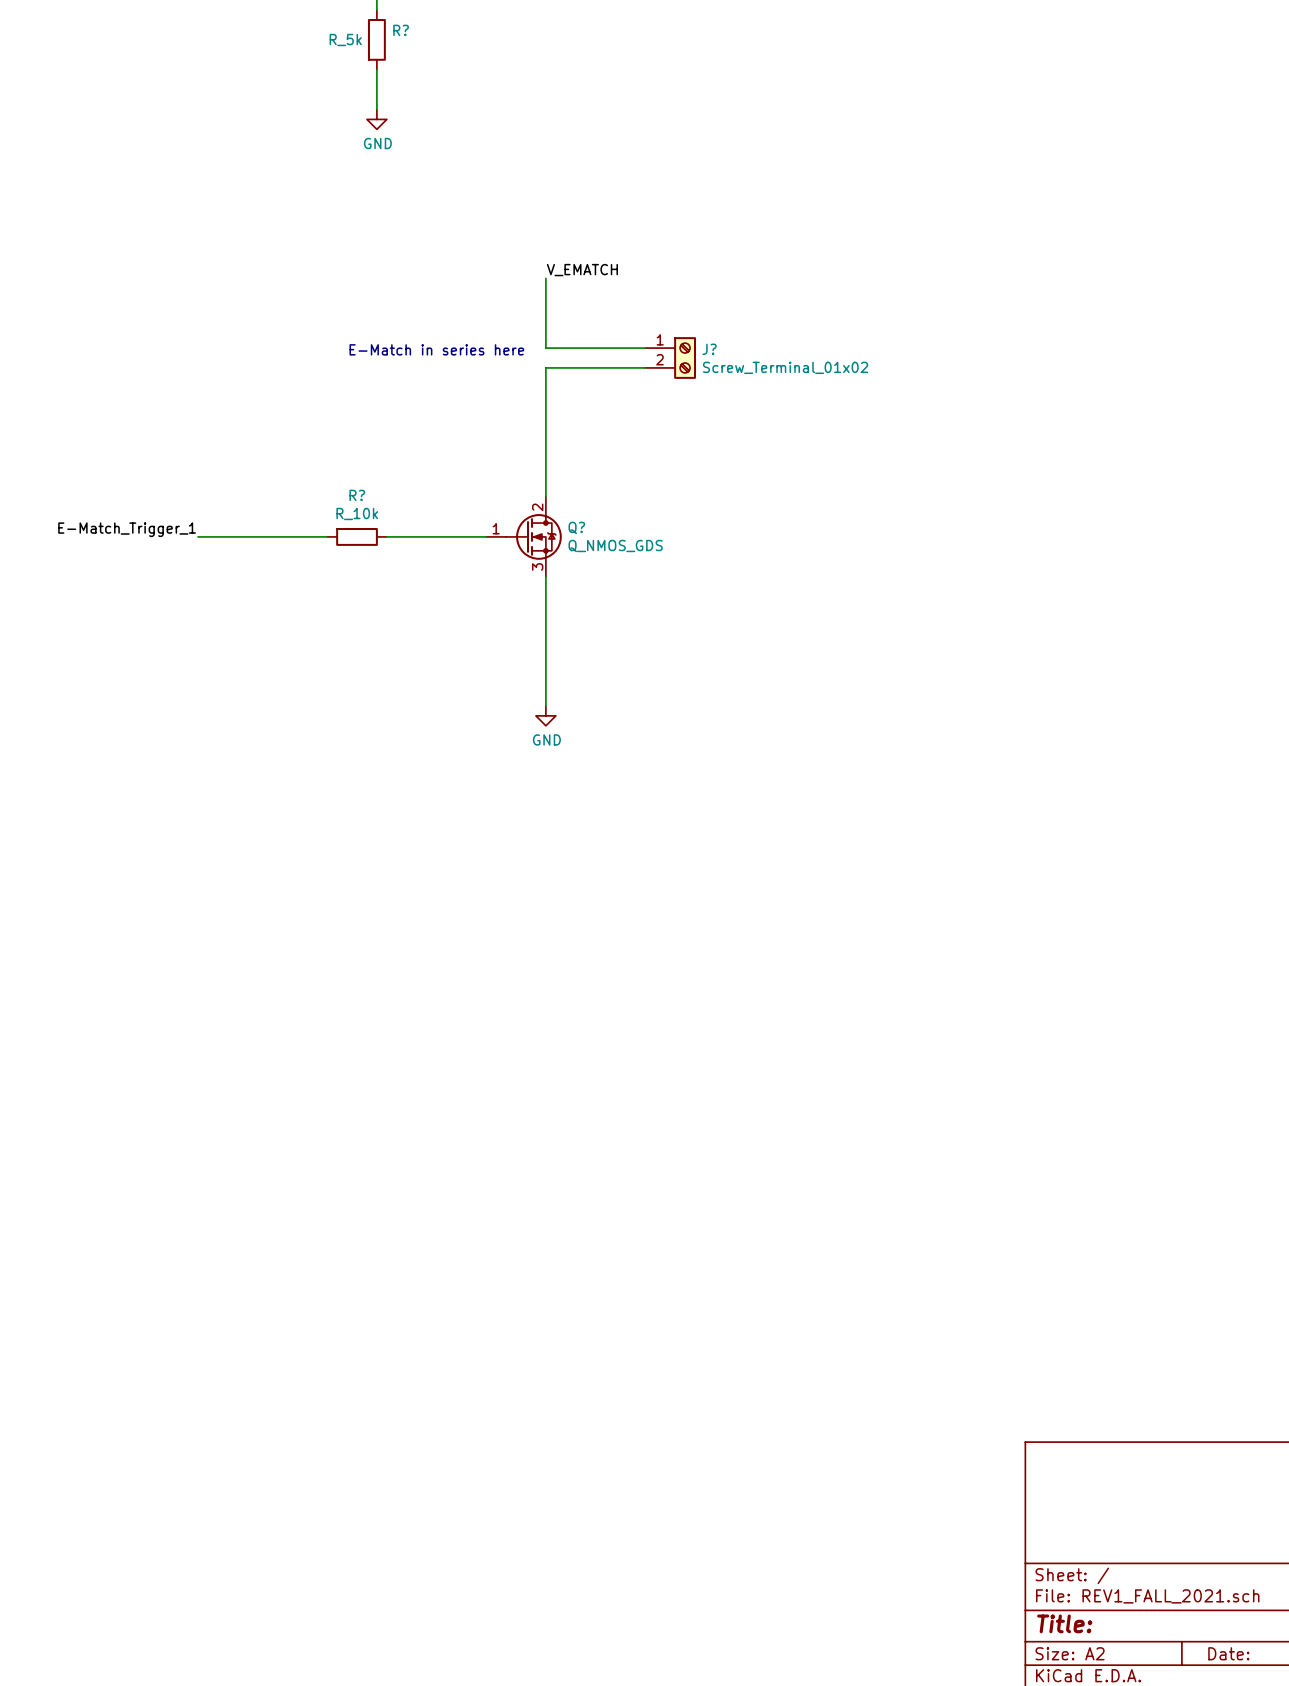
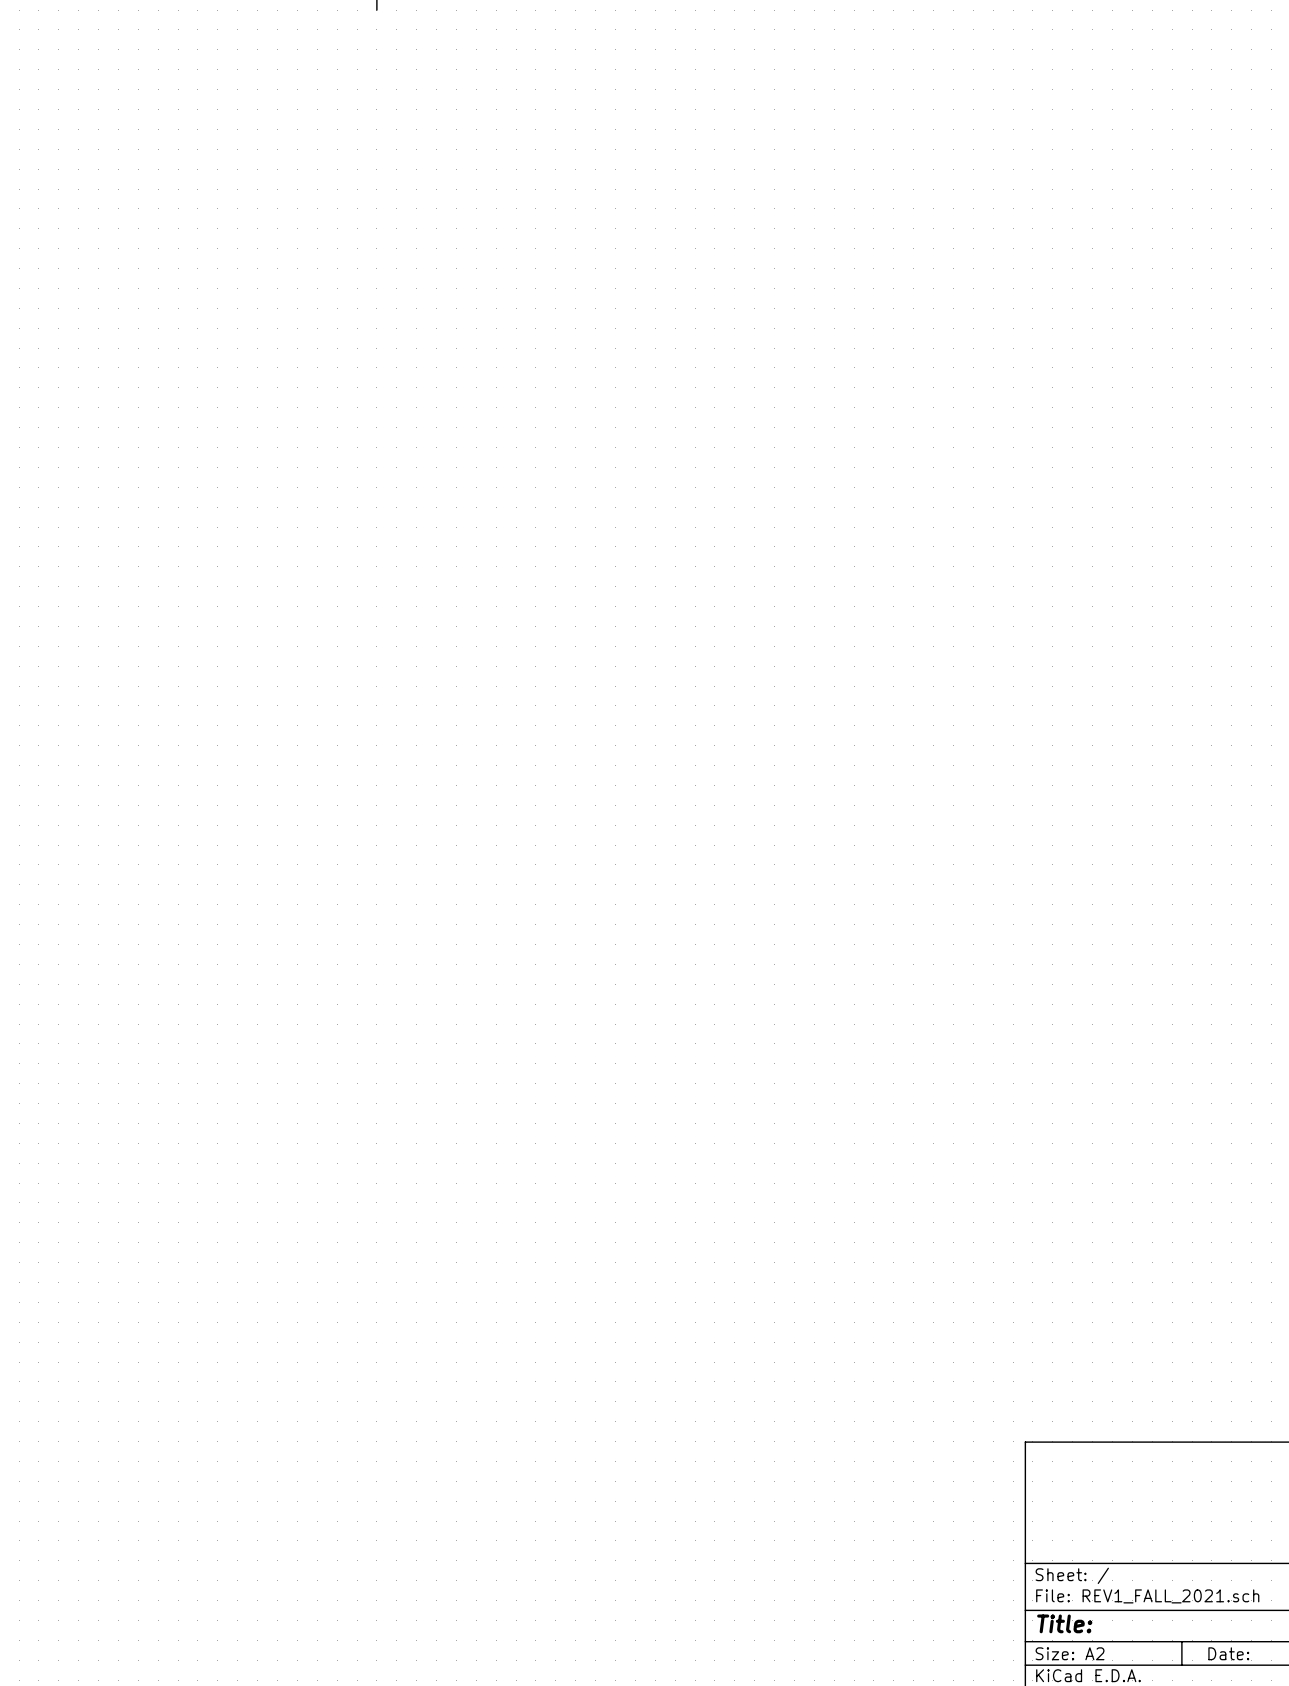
R?: R_5k (376, 39) -> none
wire: (376, 69) (376, 109) -> none
power symbol: GND (376, 119) -> none
label: V_EMATCH (582, 270) -> none
wire: (545, 278) (545, 348) (645, 348) -> none
text: E-Match in series here (436, 349) -> none
J?: Screw_Terminal_01x02 (670, 358) -> none
wire: (645, 367) (545, 367) (545, 497) -> none
label: E-Match_Trigger_1 (127, 529) -> none
wire: (197, 536) (327, 536) -> none
R?: R_10k (357, 536) -> none
wire: (386, 536) (486, 536) -> none
Q?: Q_NMOS_GDS (524, 536) -> none
wire: (545, 576) (545, 705) -> none
power symbol: GND (545, 715) -> none

